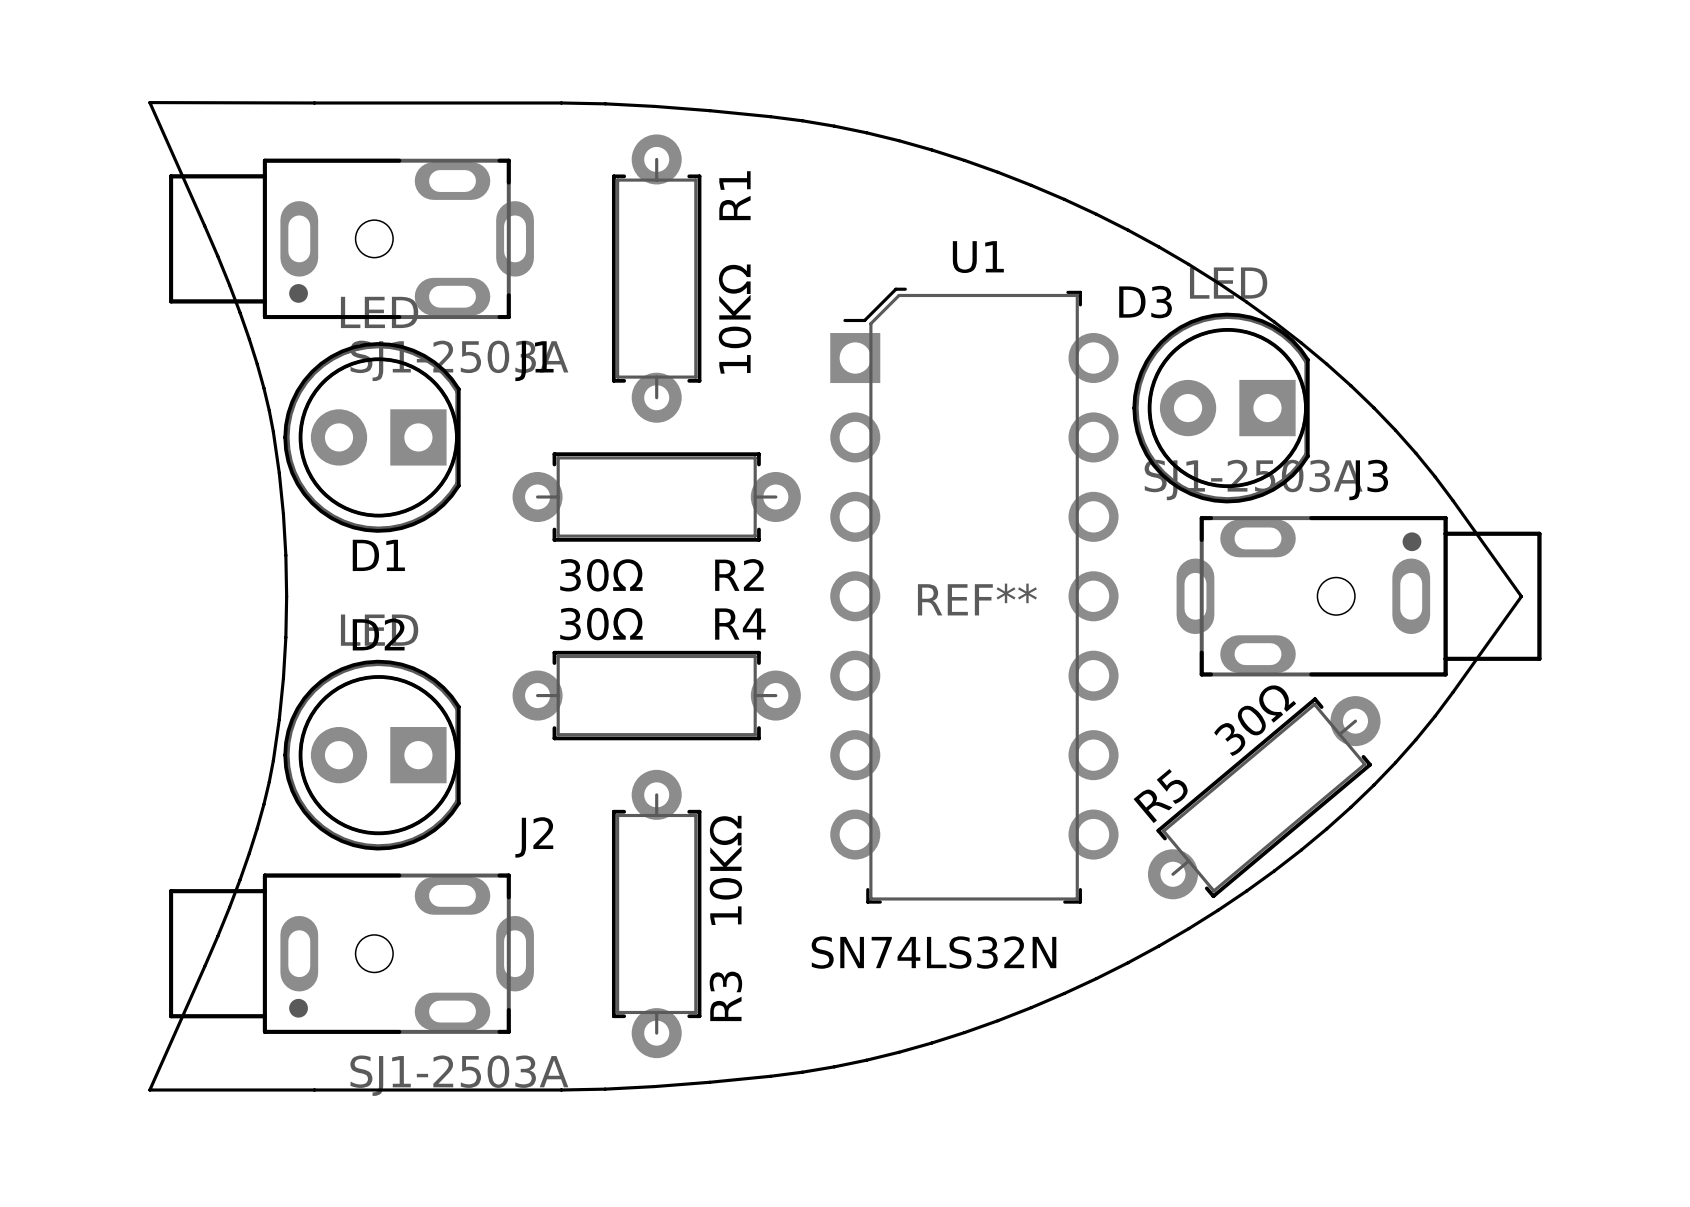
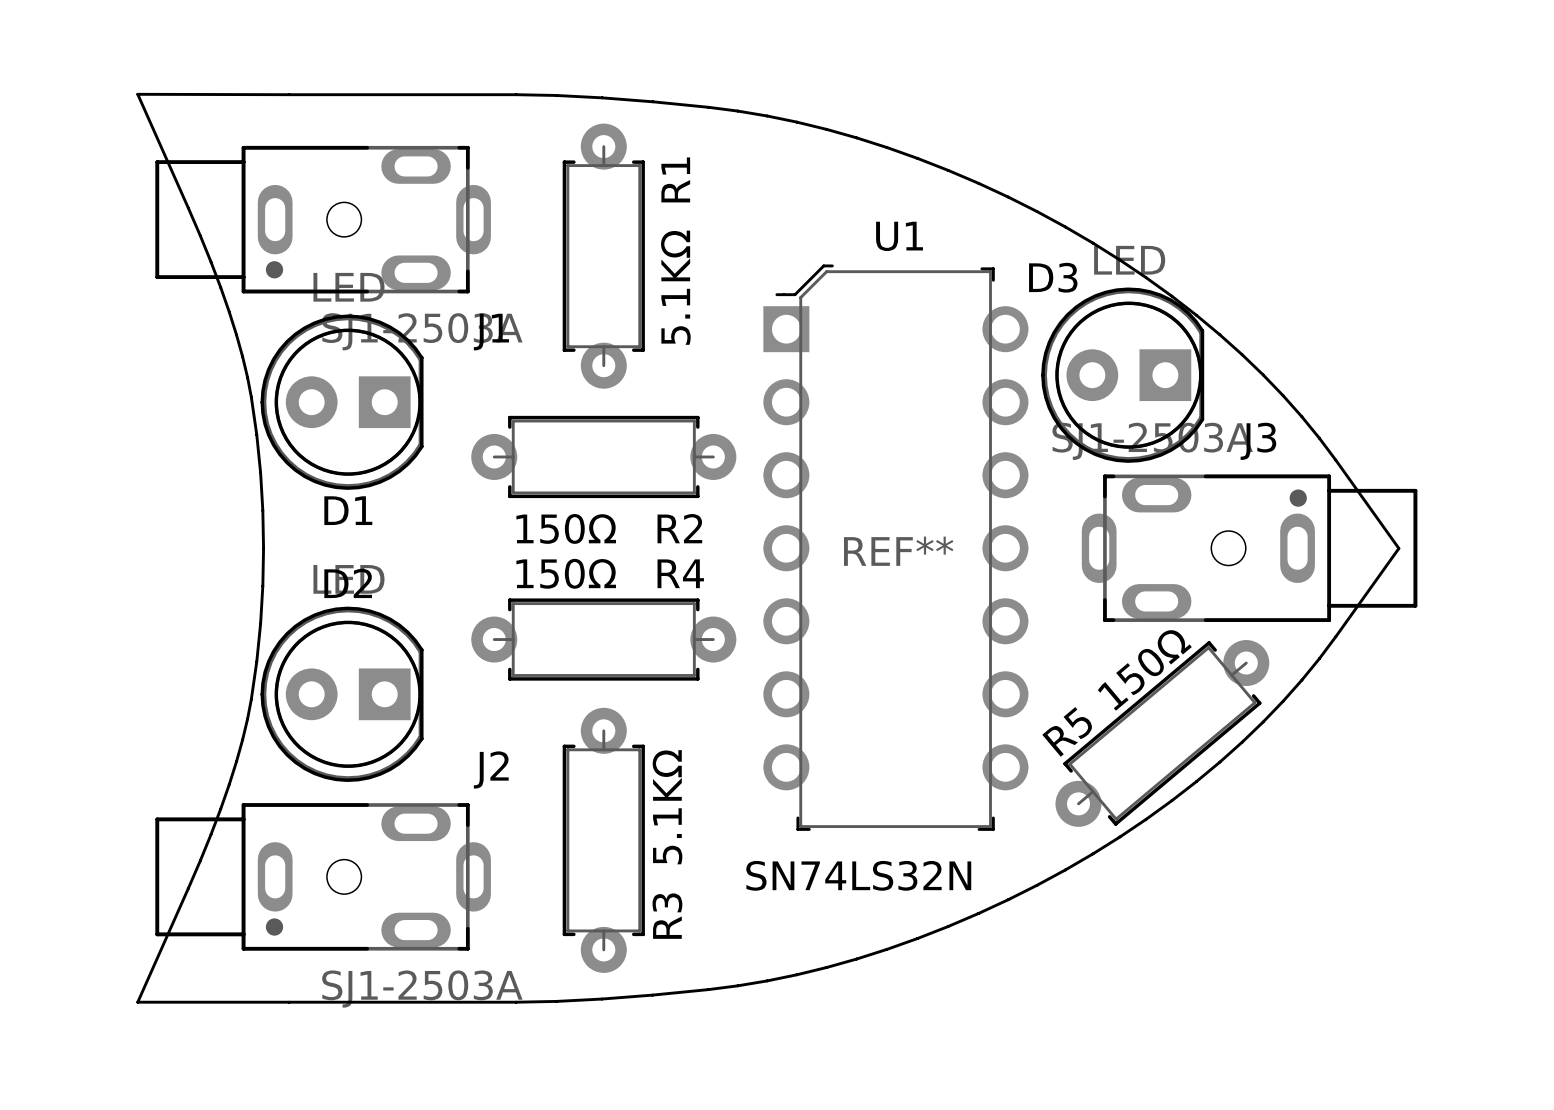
R1 value: 10KΩ (734, 319) -> 5.1KΩ (675, 287)
R2 value: 30Ω (601, 575) -> 150Ω (566, 528)
R4 value: 30Ω (601, 624) -> 150Ω (566, 573)
R5 value: 30Ω (1255, 720) -> 150Ω (1144, 670)
R3 value: 10KΩ (725, 870) -> 5.1KΩ (667, 807)

